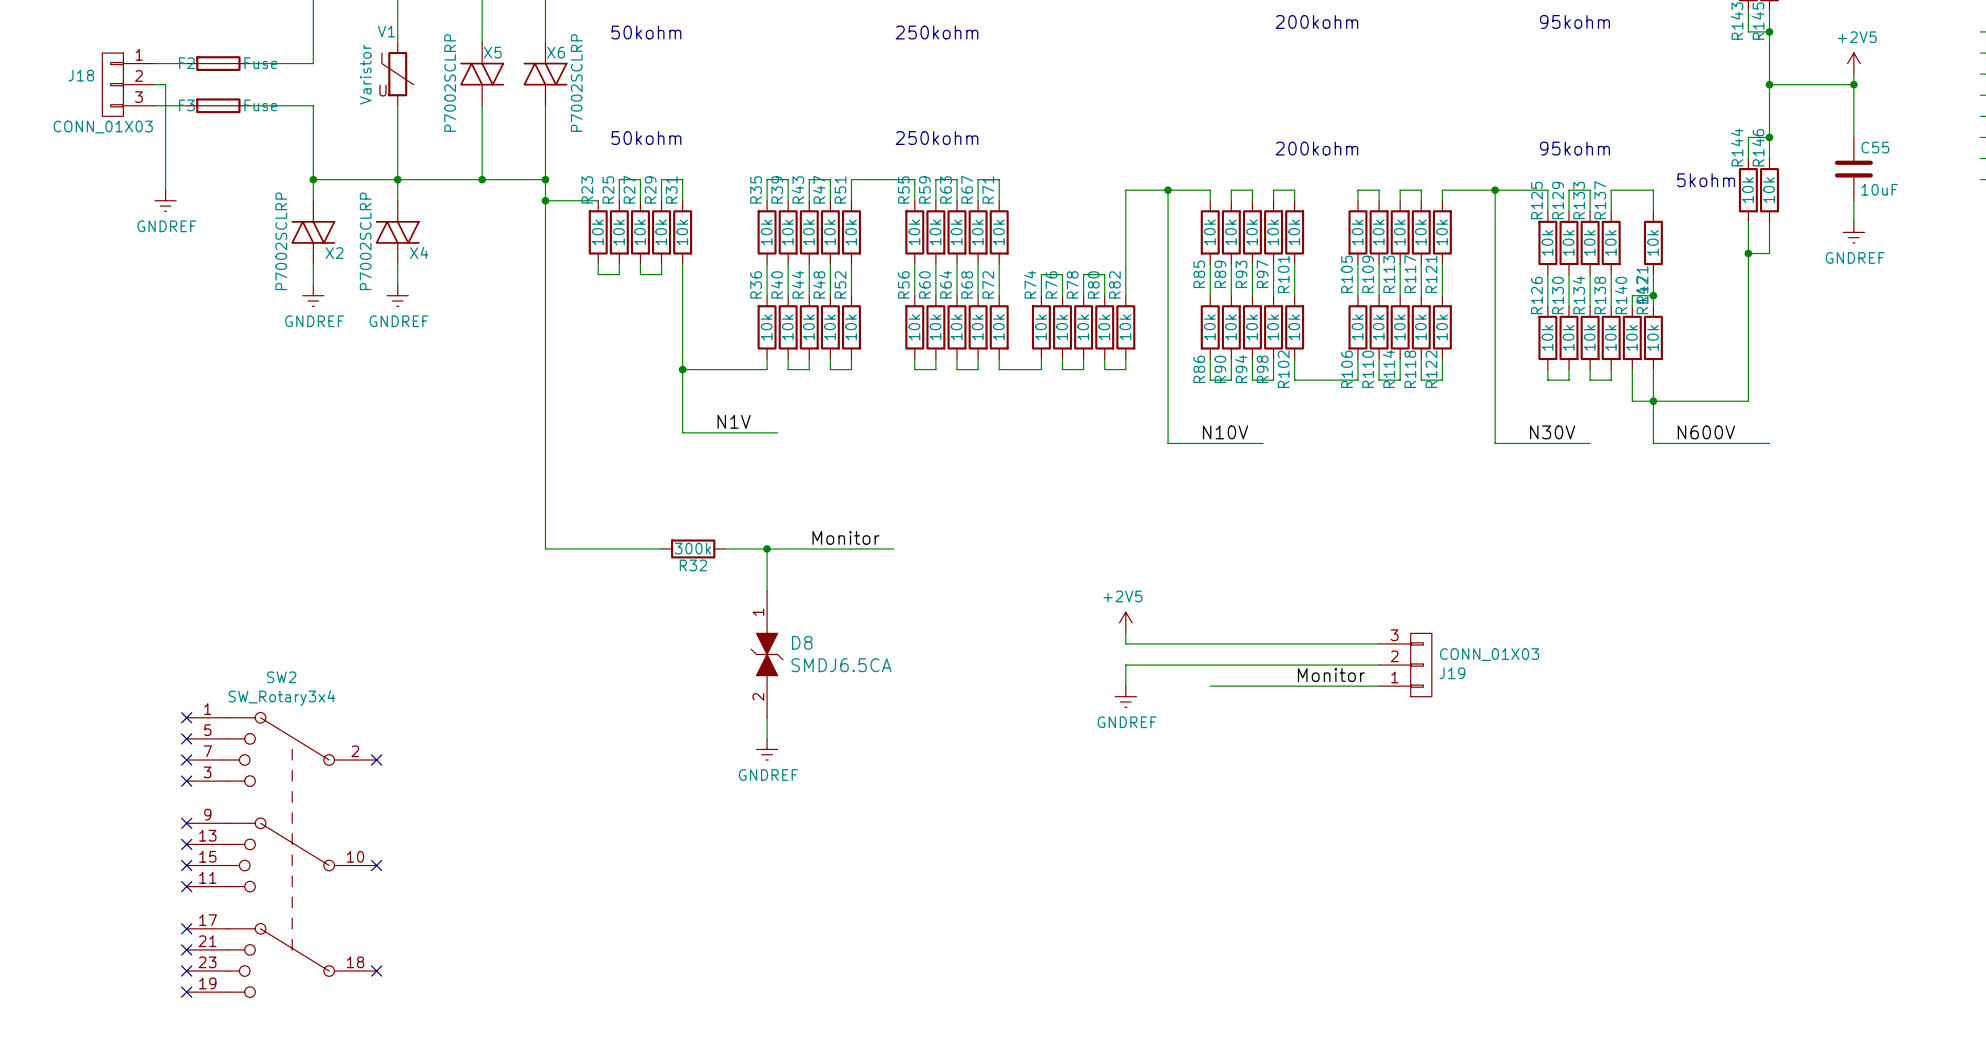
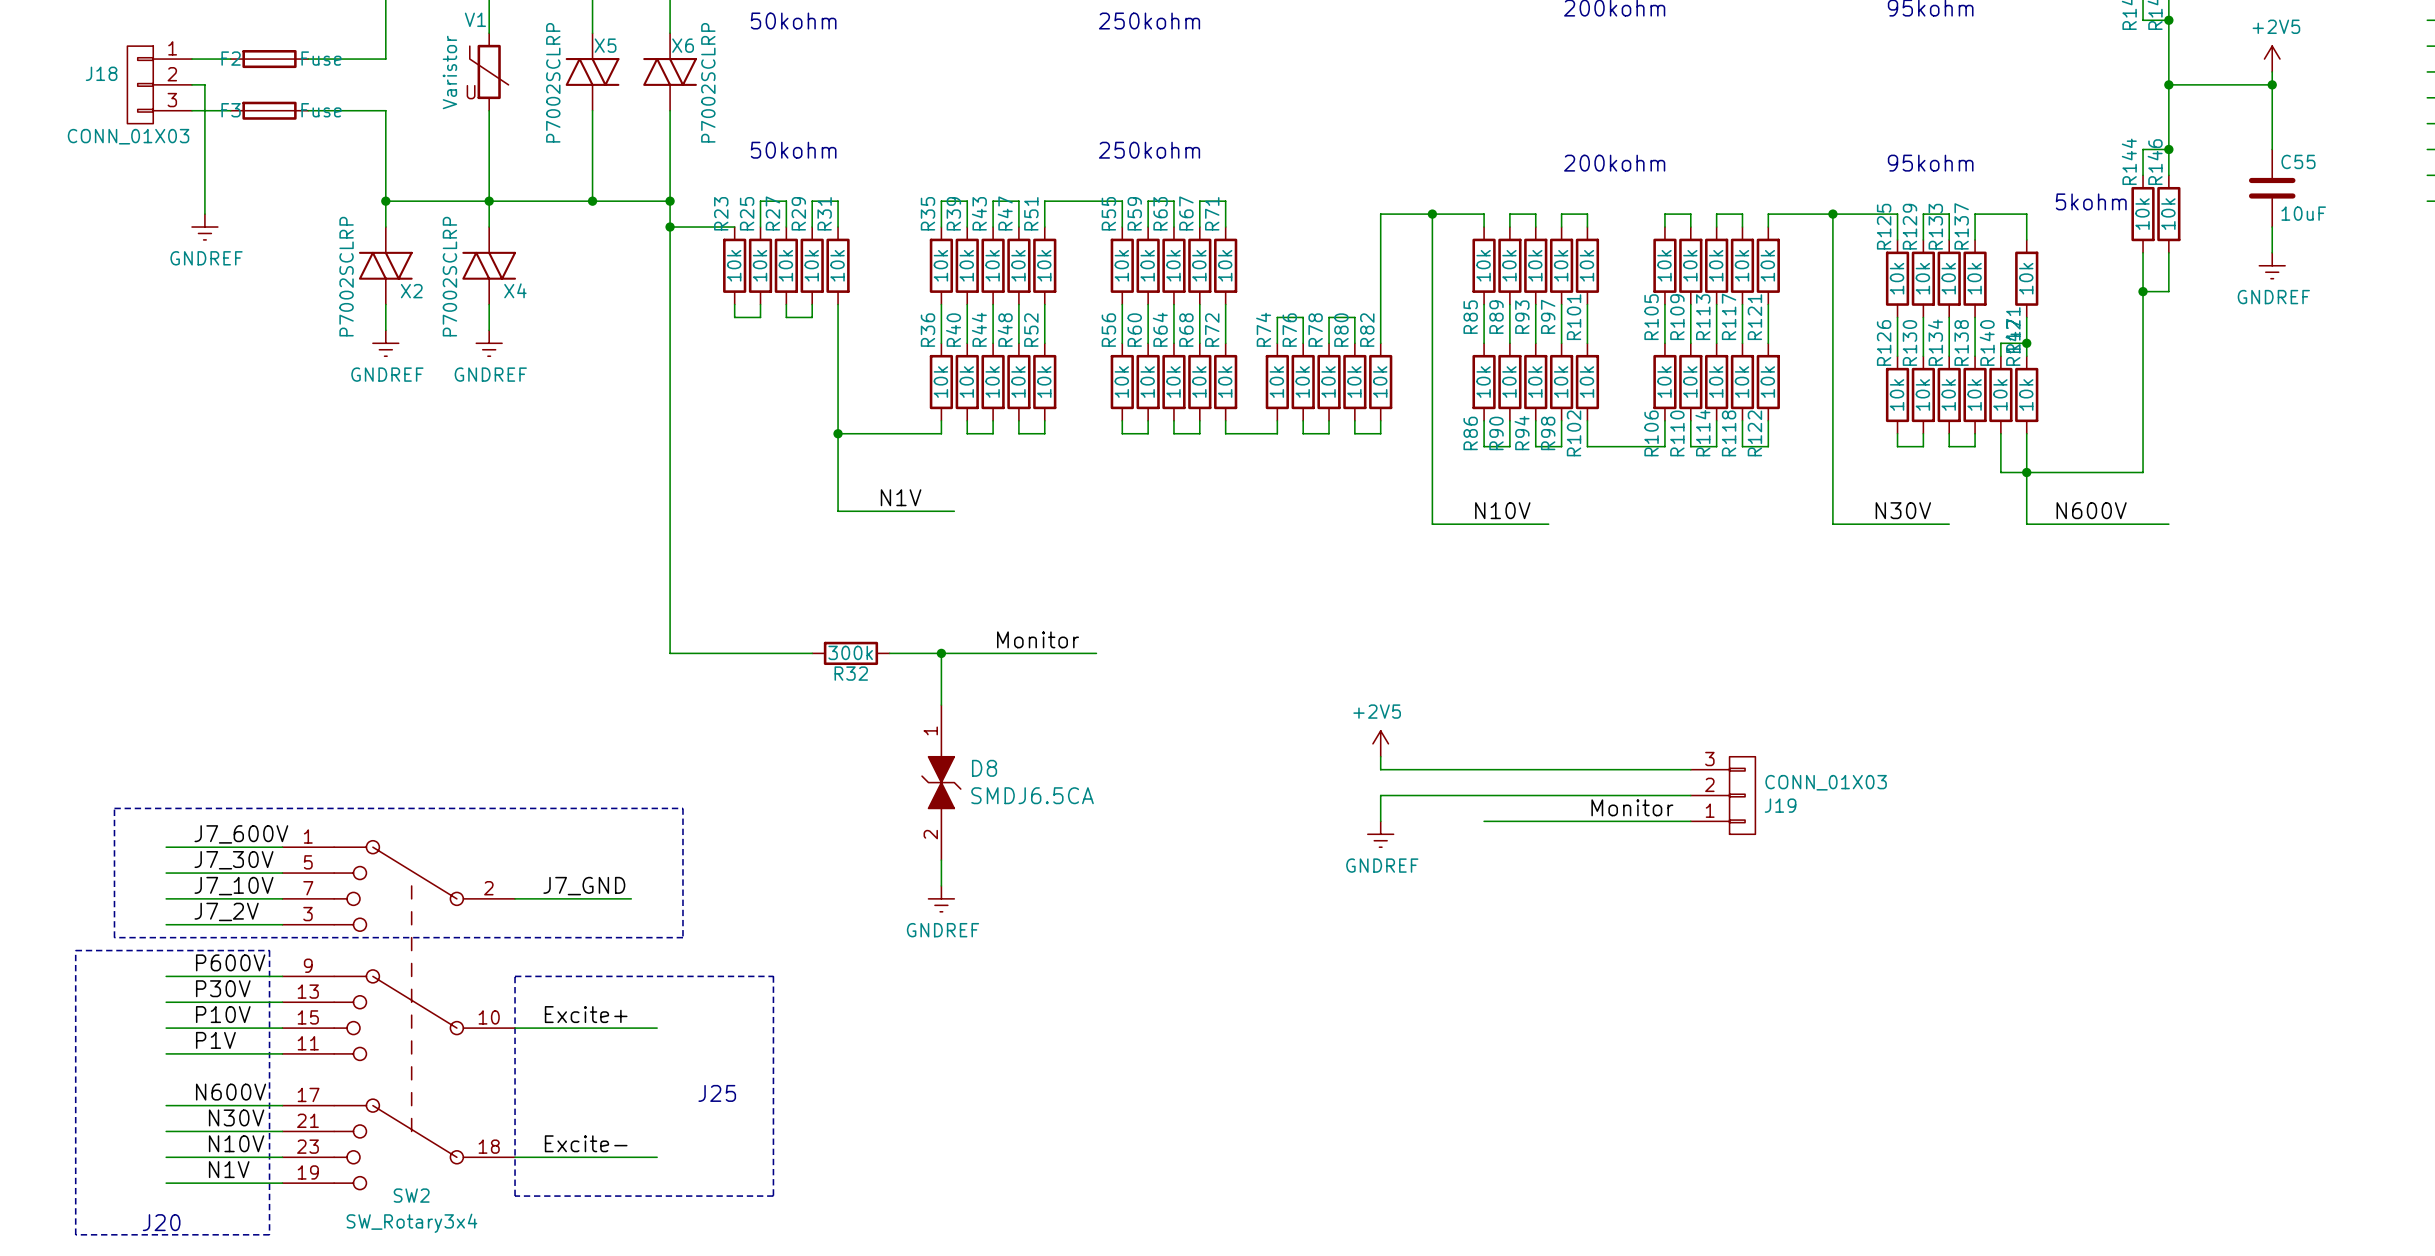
line: none -> (114, 808) (682, 808) (682, 937) (114, 937) (114, 808)
SW2 name position: SW2 (281, 677) -> SW2 (411, 1195)
label: none -> J7_600V (241, 834)
SW2 value position: SW_Rotary3x4 (281, 698) -> SW_Rotary3x4 (411, 1223)
wire: none -> (166, 847) (282, 847)
no-connect mark: (186, 717) -> none
label: none -> J7_30V (234, 860)
wire: none -> (166, 873) (282, 873)
no-connect mark: (186, 738) -> none
label: none -> J7_10V (234, 886)
label: none -> J7_GND (584, 886)
wire: none -> (166, 898) (282, 898)
wire: none -> (515, 898) (631, 898)
label: none -> J7_2V (226, 911)
no-connect mark: (186, 760) -> none
no-connect mark: (376, 760) -> none
wire: none -> (166, 924) (282, 924)
no-connect mark: (186, 781) -> none
line: none -> (75, 950) (269, 950) (269, 1234) (75, 1234) (75, 950)
label: none -> P600V (230, 962)
wire: none -> (166, 976) (282, 976)
line: none -> (515, 976) (773, 976) (773, 1196) (515, 1196) (515, 976)
label: none -> P30V (223, 988)
no-connect mark: (186, 823) -> none
wire: none -> (166, 1002) (282, 1002)
label: none -> P10V (223, 1014)
label: none -> Excite+ (586, 1014)
no-connect mark: (186, 844) -> none
wire: none -> (166, 1028) (282, 1028)
SW2 position: (281, 854) -> (398, 1015)
wire: none -> (515, 1028) (657, 1028)
label: none -> P1V (215, 1040)
no-connect mark: (186, 865) -> none
no-connect mark: (376, 865) -> none
wire: none -> (166, 1053) (282, 1053)
no-connect mark: (186, 886) -> none
label: none -> N600V (231, 1092)
text: none -> J25 (717, 1093)
wire: none -> (166, 1105) (282, 1105)
no-connect mark: (186, 928) -> none
label: none -> N30V (236, 1117)
wire: none -> (166, 1131) (282, 1131)
no-connect mark: (186, 949) -> none
label: none -> N10V (236, 1143)
label: none -> Excite- (586, 1143)
wire: none -> (166, 1157) (282, 1157)
wire: none -> (515, 1157) (657, 1157)
label: none -> N1V (229, 1169)
no-connect mark: (186, 971) -> none
no-connect mark: (376, 971) -> none
wire: none -> (166, 1183) (282, 1183)
no-connect mark: (186, 992) -> none
text: none -> J20 (161, 1222)

